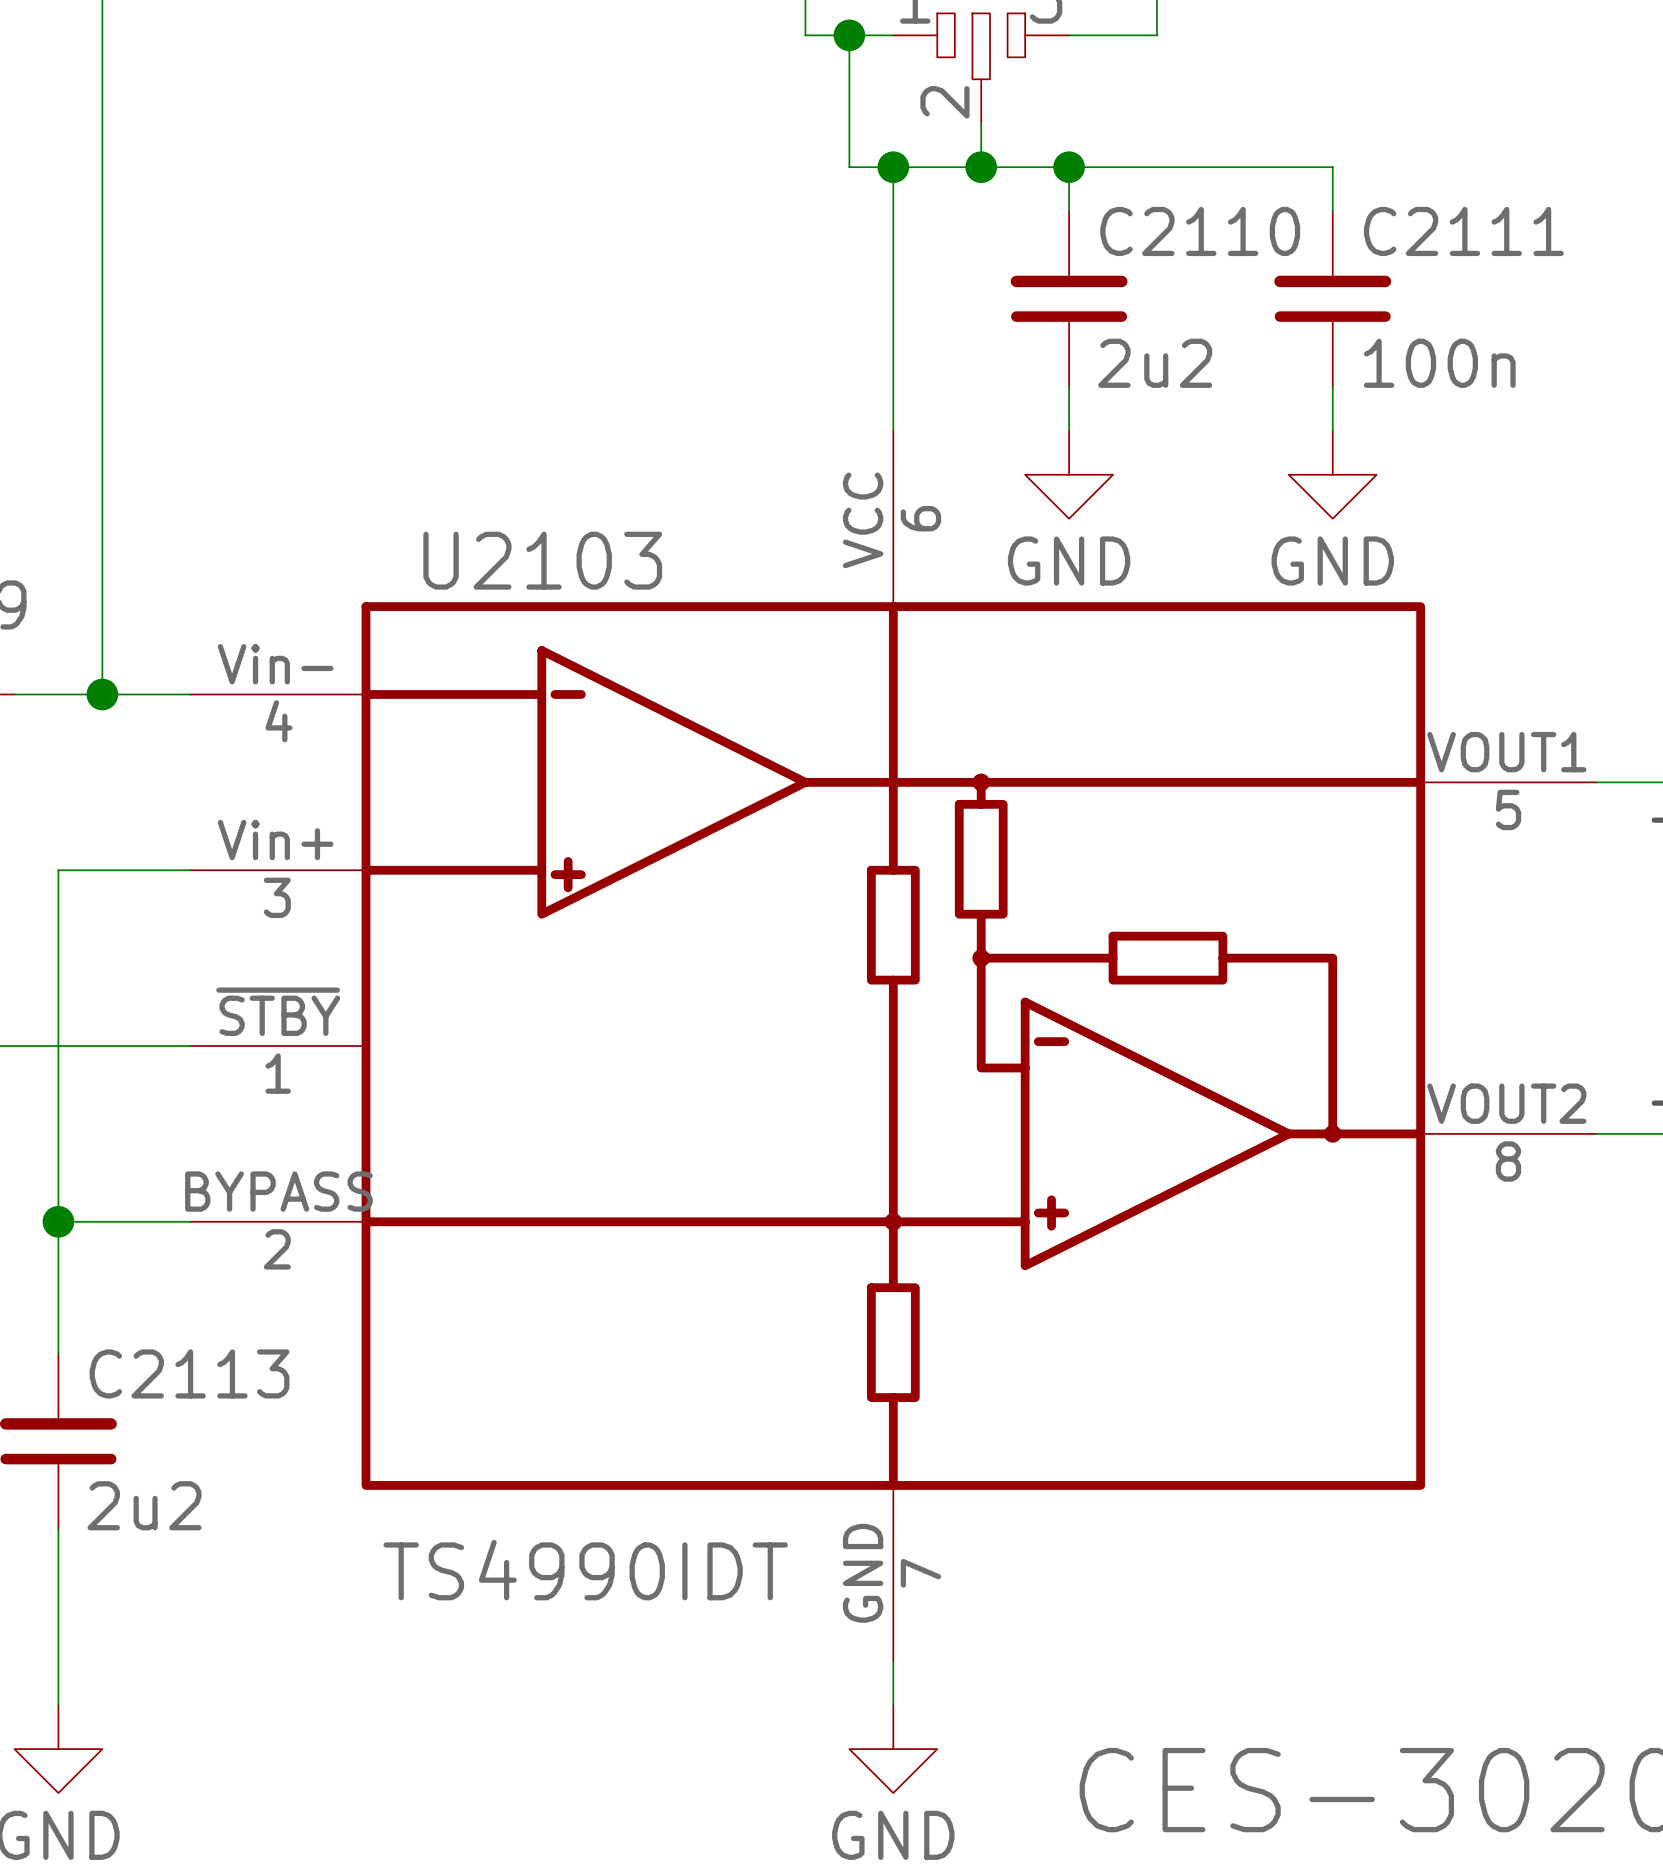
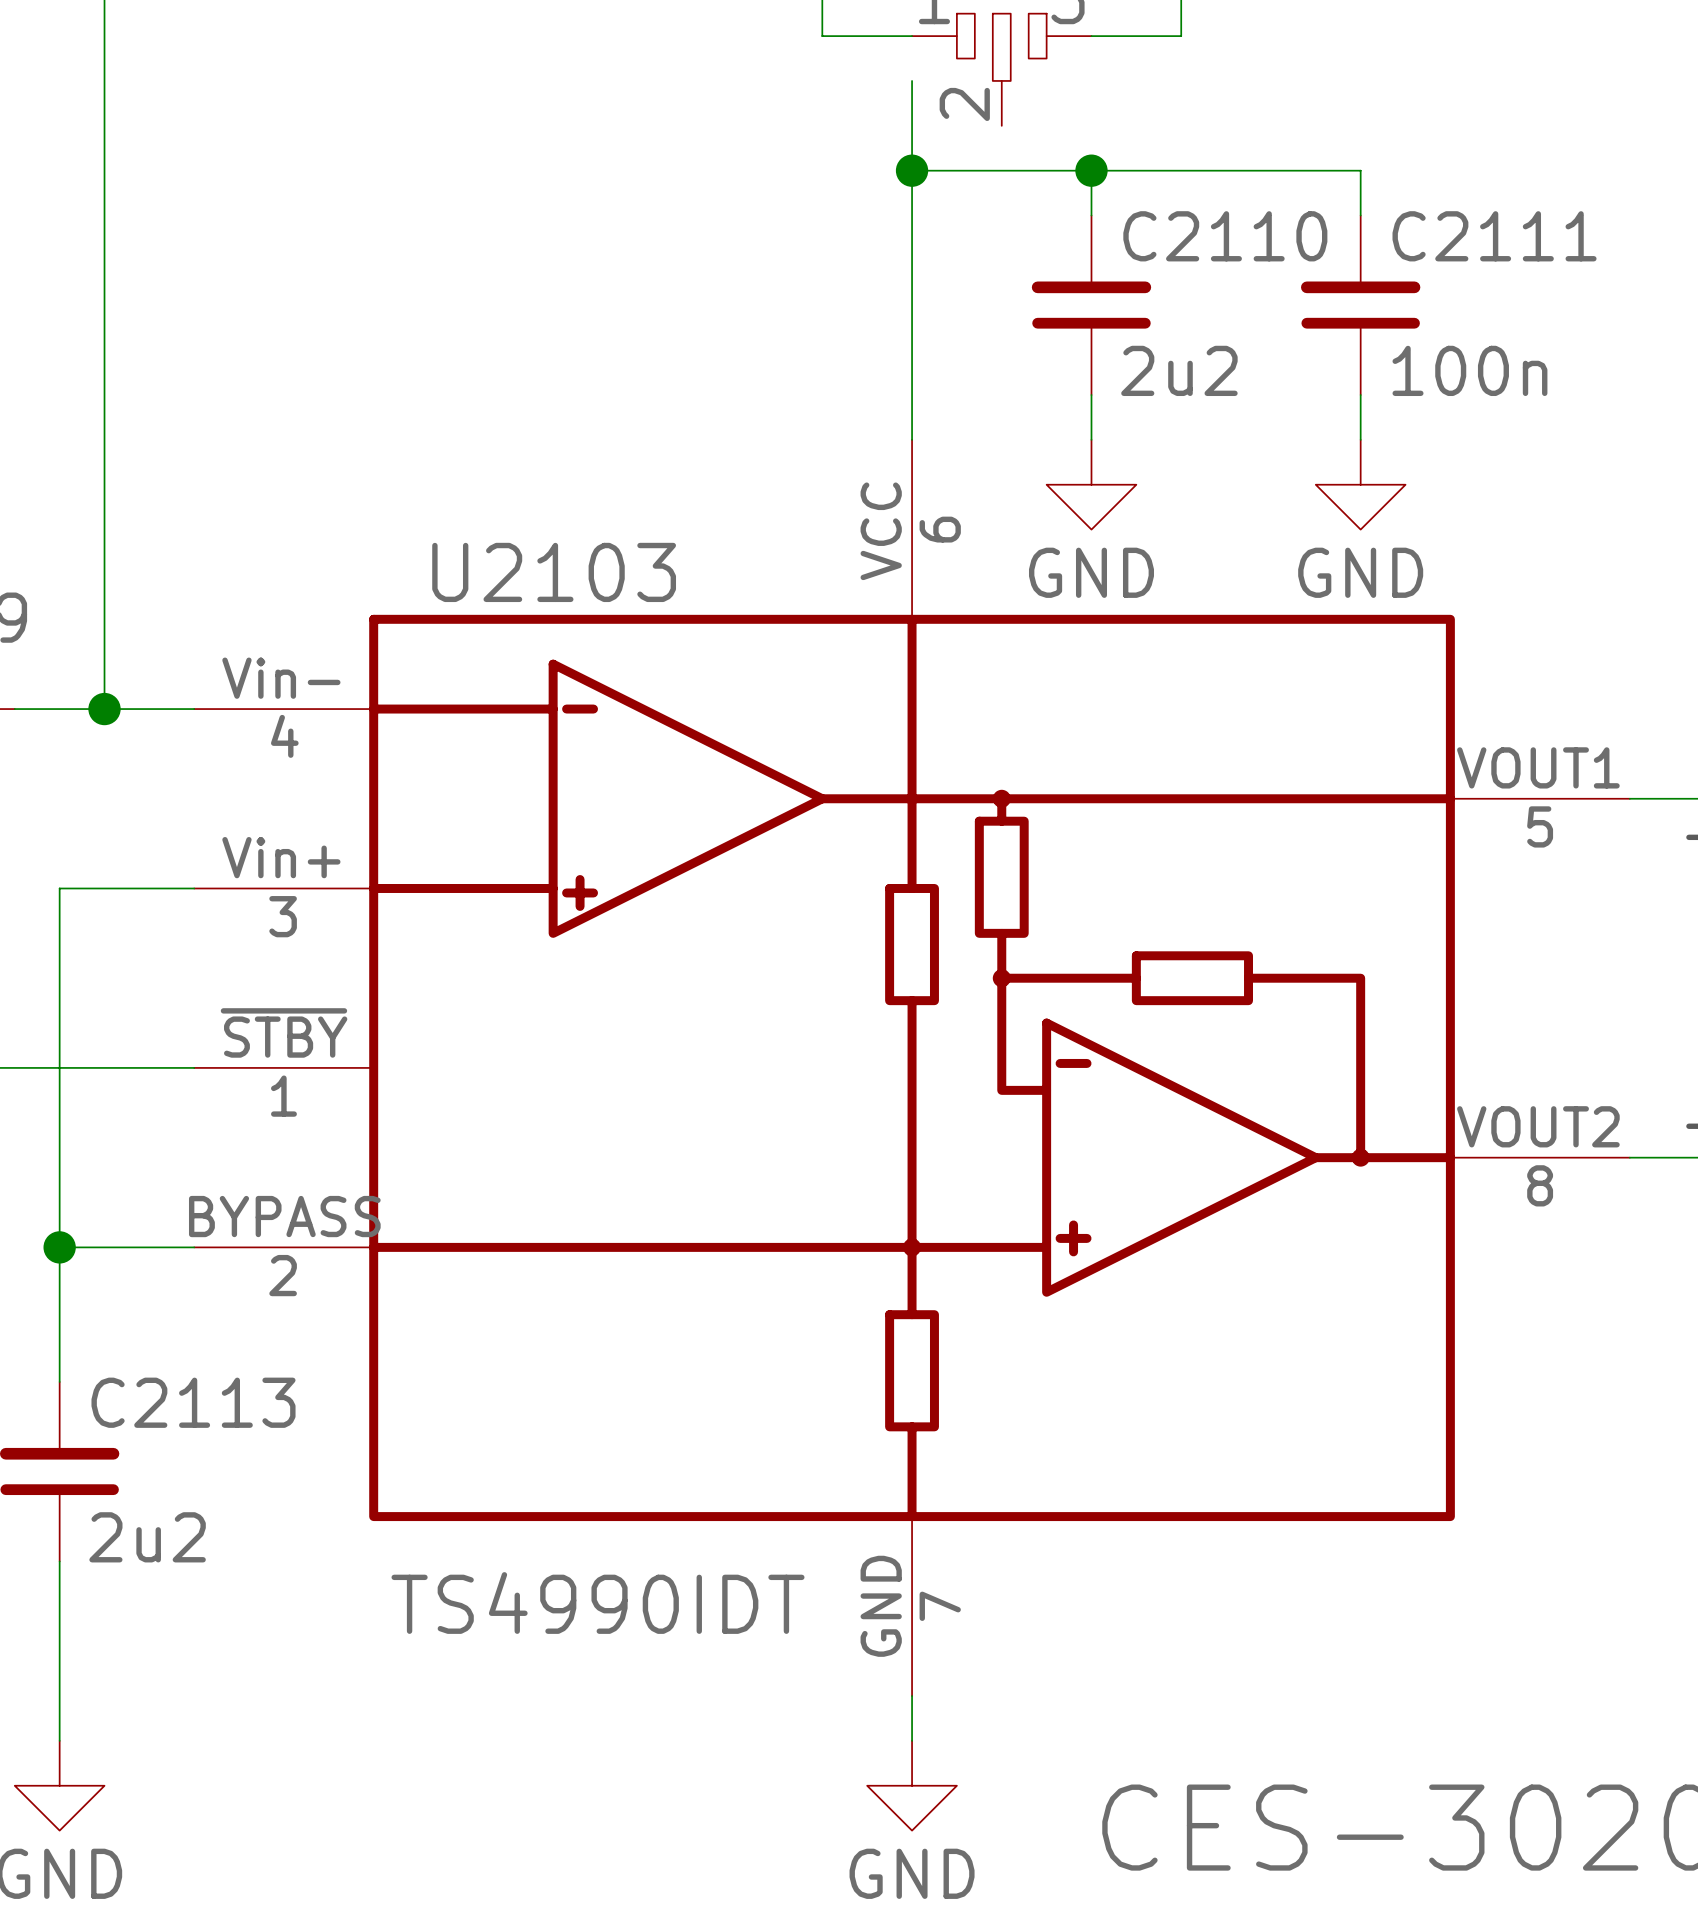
wire: (849, 35) (849, 167) (893, 167) -> (912, 80) (912, 170)
junction: (849, 35) -> none
wire: (981, 123) (981, 167) -> none
junction: (981, 167) -> none

